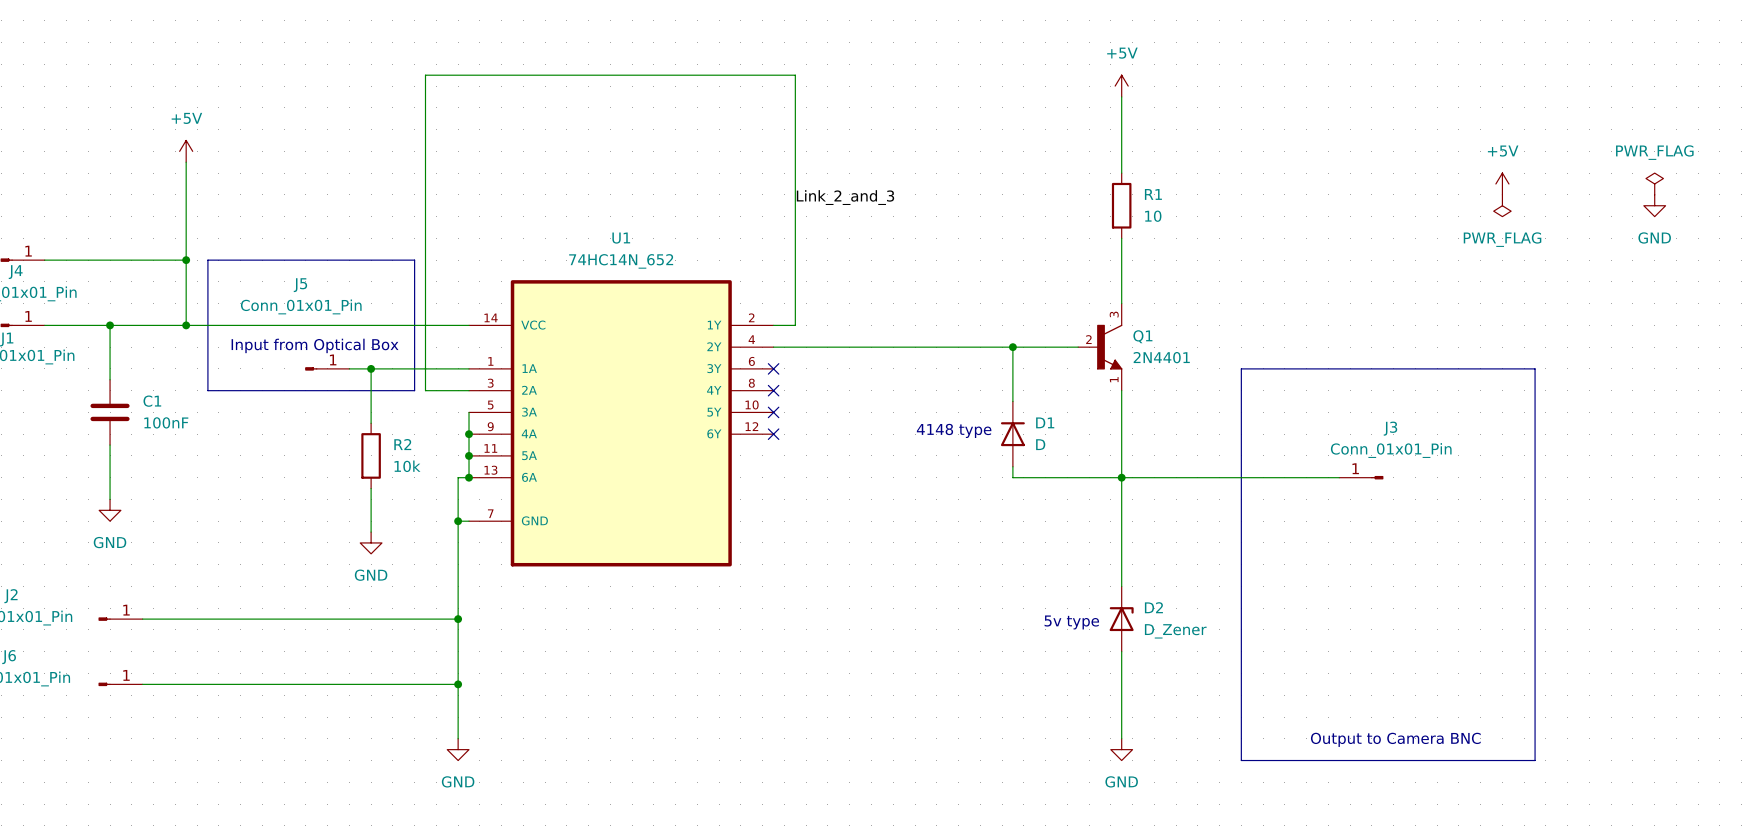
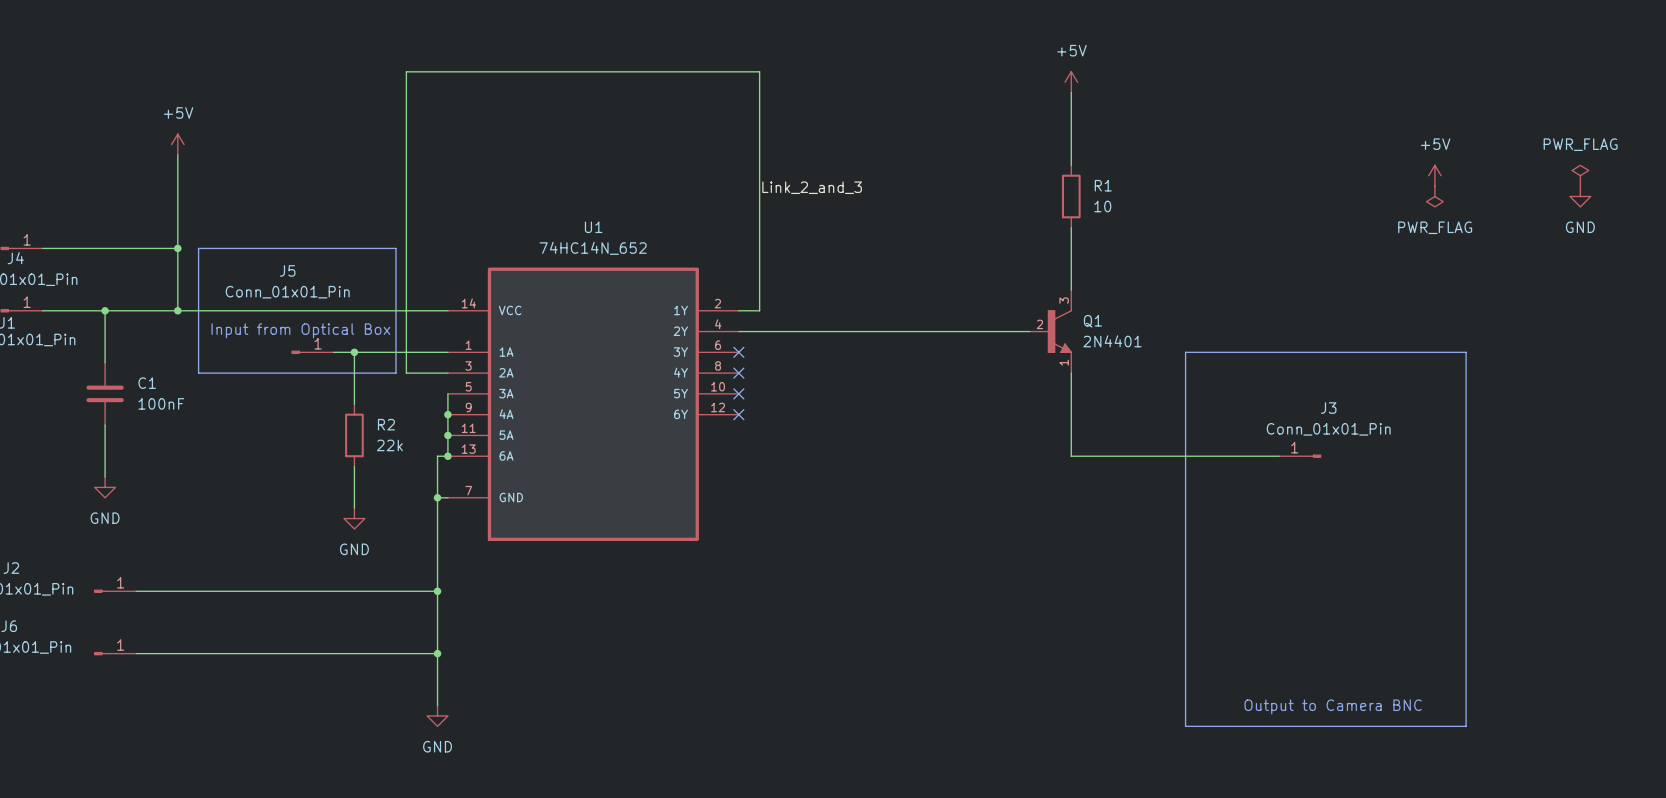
wire: (1012, 347) (1012, 401) -> none
junction: (1012, 347) -> none
text: 4148 type (954, 430) -> none
D1: D (1012, 434) -> none
R2 value: 10k (407, 466) -> 22k (389, 445)
wire: (1012, 466) (1012, 477) (1121, 477) (1121, 586) -> none
junction: (1121, 477) -> none
D2: D_Zener (1121, 619) -> none
text: 5v type (1071, 622) -> none
wire: (1121, 651) (1121, 738) -> none
power symbol: GND (1121, 749) -> none

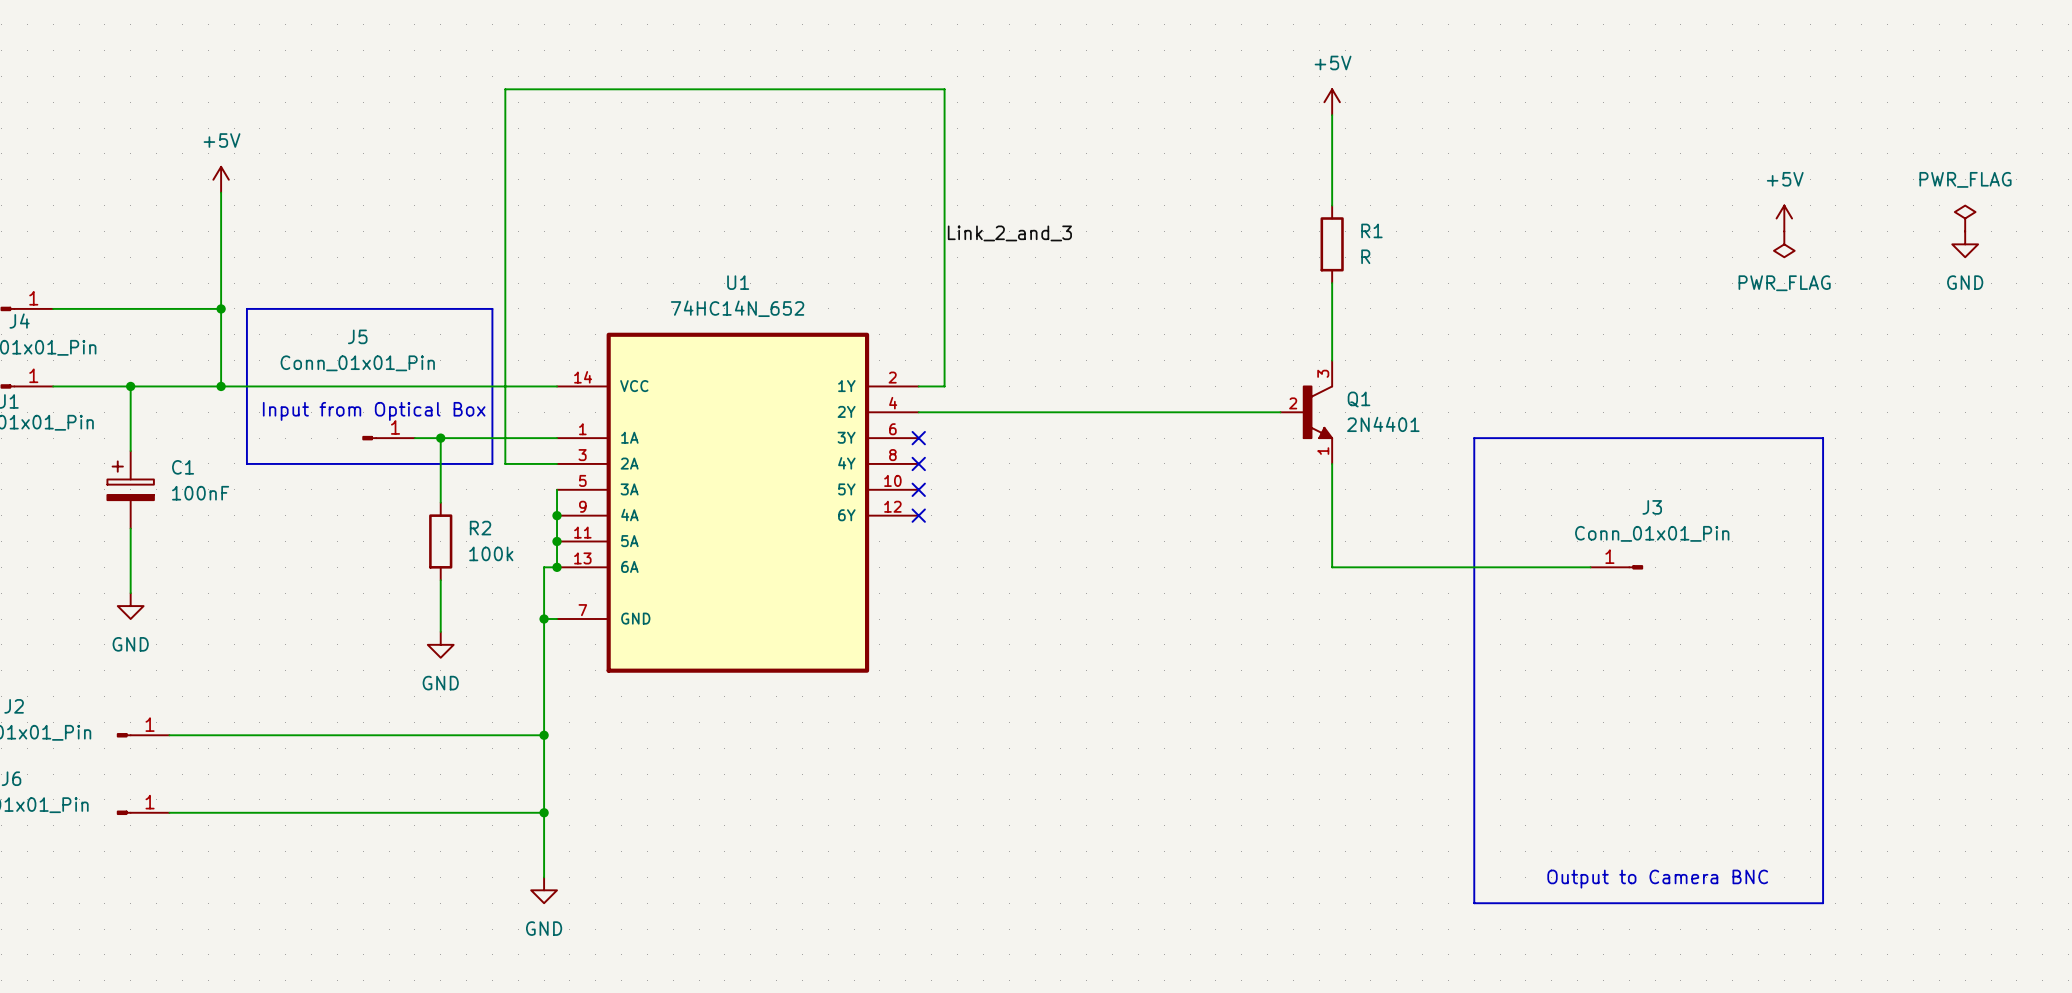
R1 value: 10 (1102, 206) -> R (1365, 256)
C1 symbol: [86, 362, 124, 426] -> [107, 451, 154, 529]
R2 value: 22k (389, 445) -> 100k (491, 553)

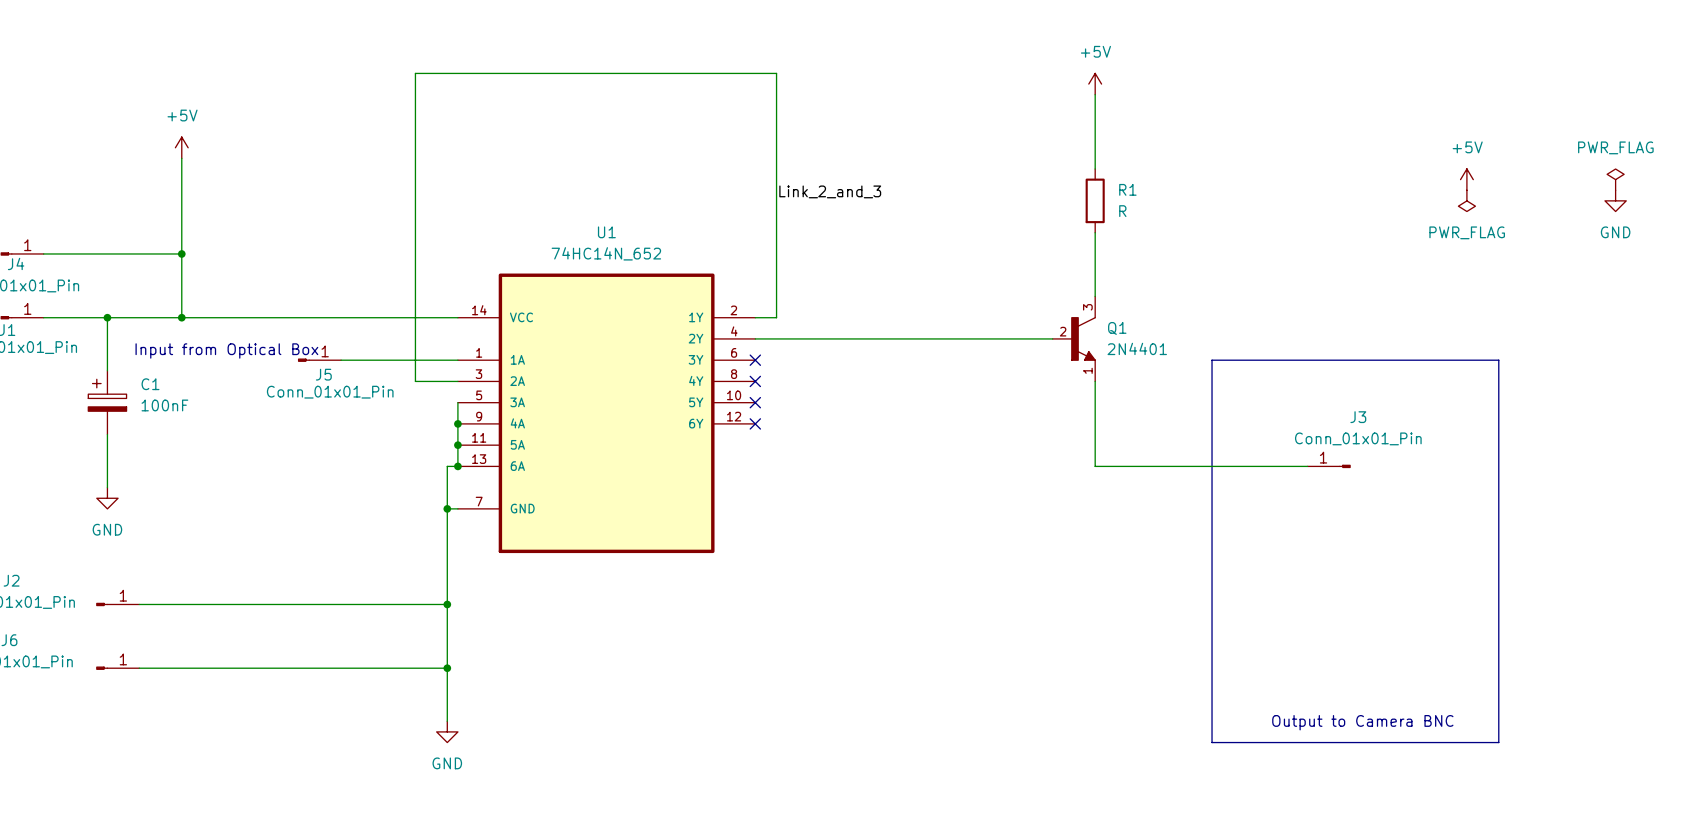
line: (246, 308) (492, 308) (492, 463) (246, 463) (246, 308) -> none
J5 name position: J5 (357, 336) -> J5 (323, 374)
J5 value position: Conn_01x01_Pin (357, 363) -> Conn_01x01_Pin (330, 392)
text position: Input from Optical Box (374, 411) -> Input from Optical Box (226, 350)
wire: (440, 438) (440, 502) -> none
junction: (440, 438) -> none
R2: 100k (440, 541) -> none
wire: (440, 580) (440, 631) -> none
power symbol: GND (440, 644) -> none

